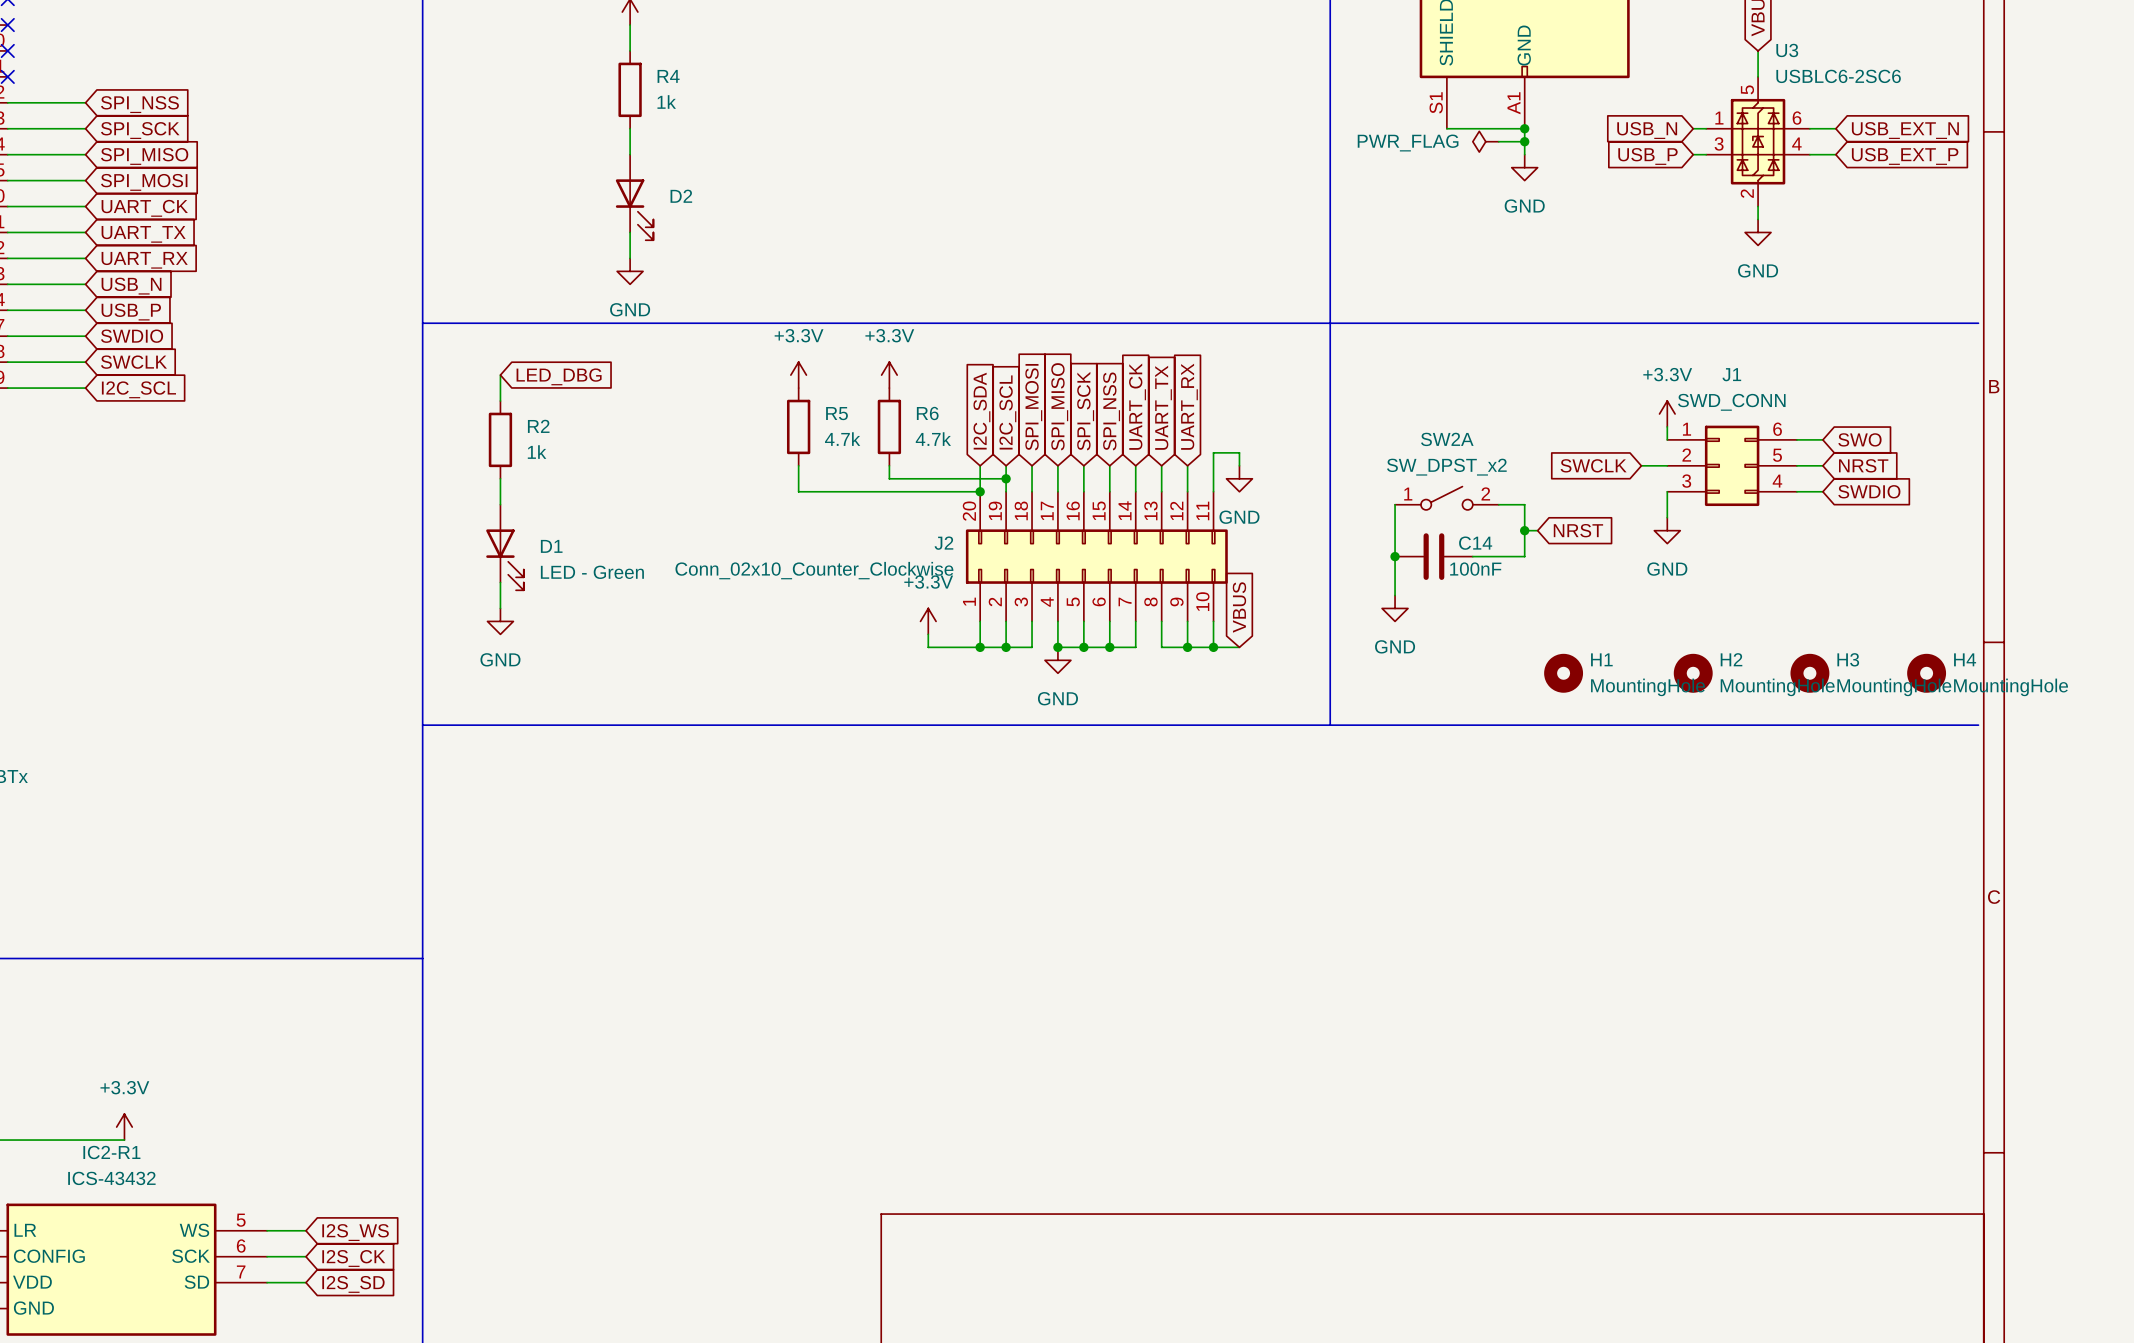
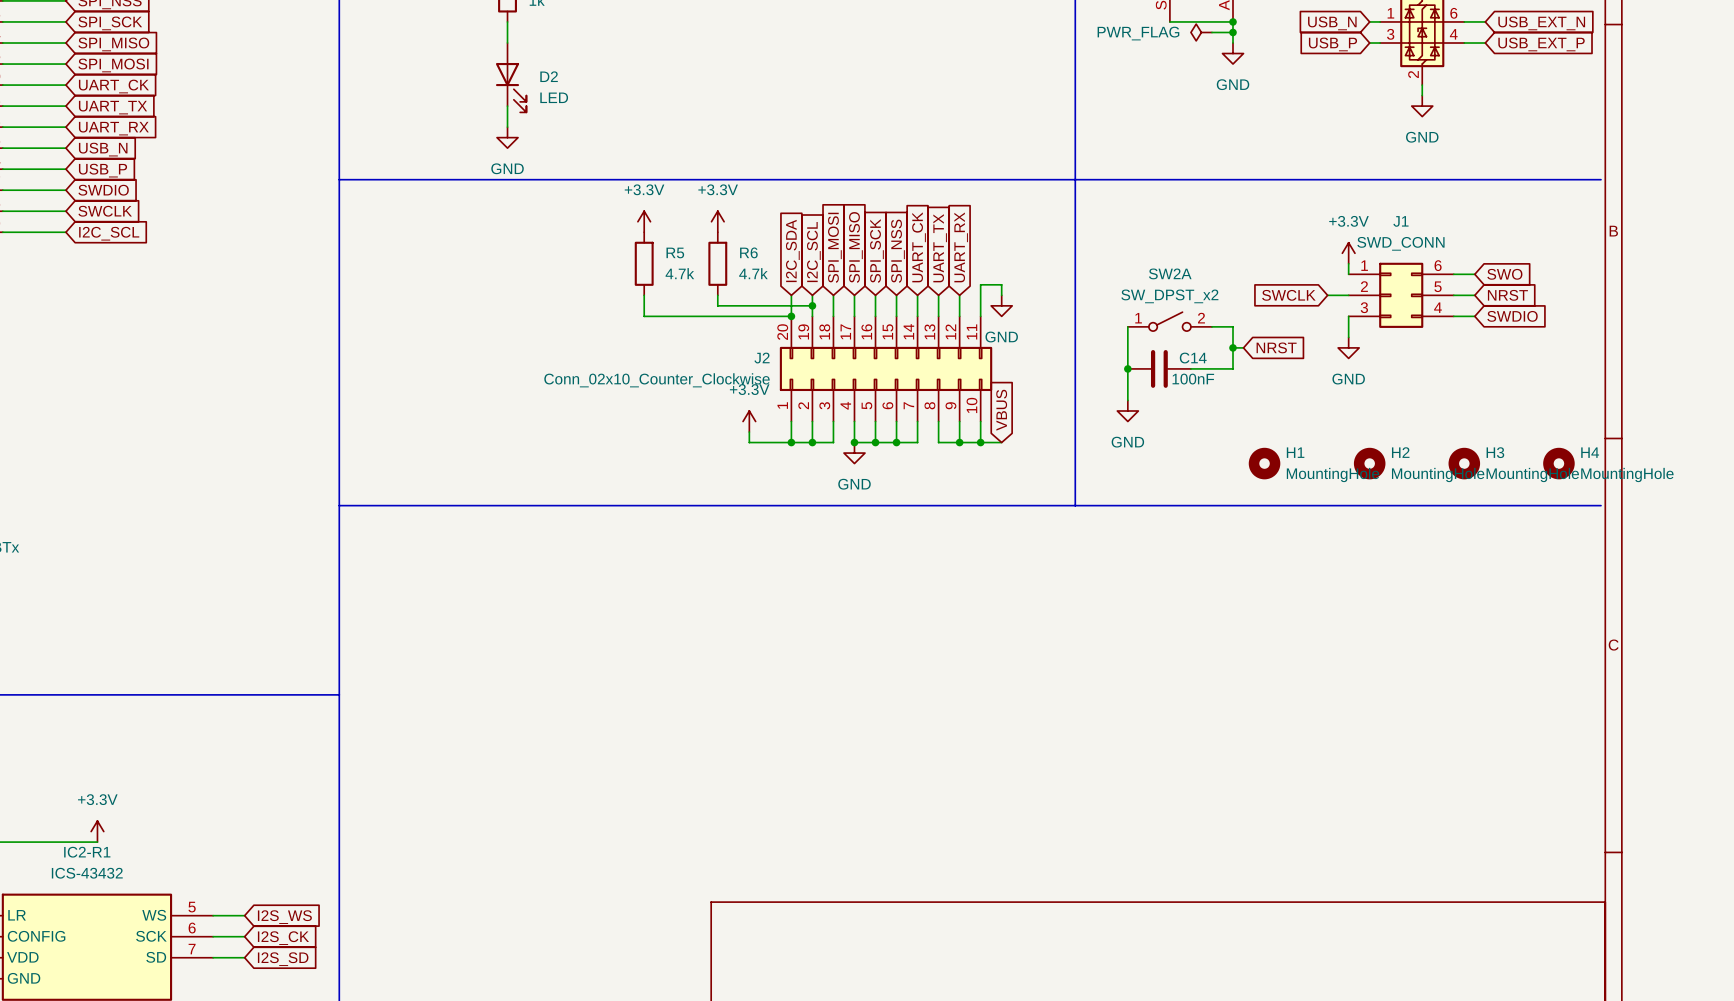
D2 value: none -> LED (554, 97)
wire: (500, 375) (500, 401) -> none
global label: LED_DBG (559, 376) -> none
R2: 1k (500, 439) -> none
wire: (500, 478) (500, 504) -> none
D1: LED - Green (504, 547) -> none
wire: (500, 582) (500, 608) -> none
power symbol: GND (500, 621) -> none

